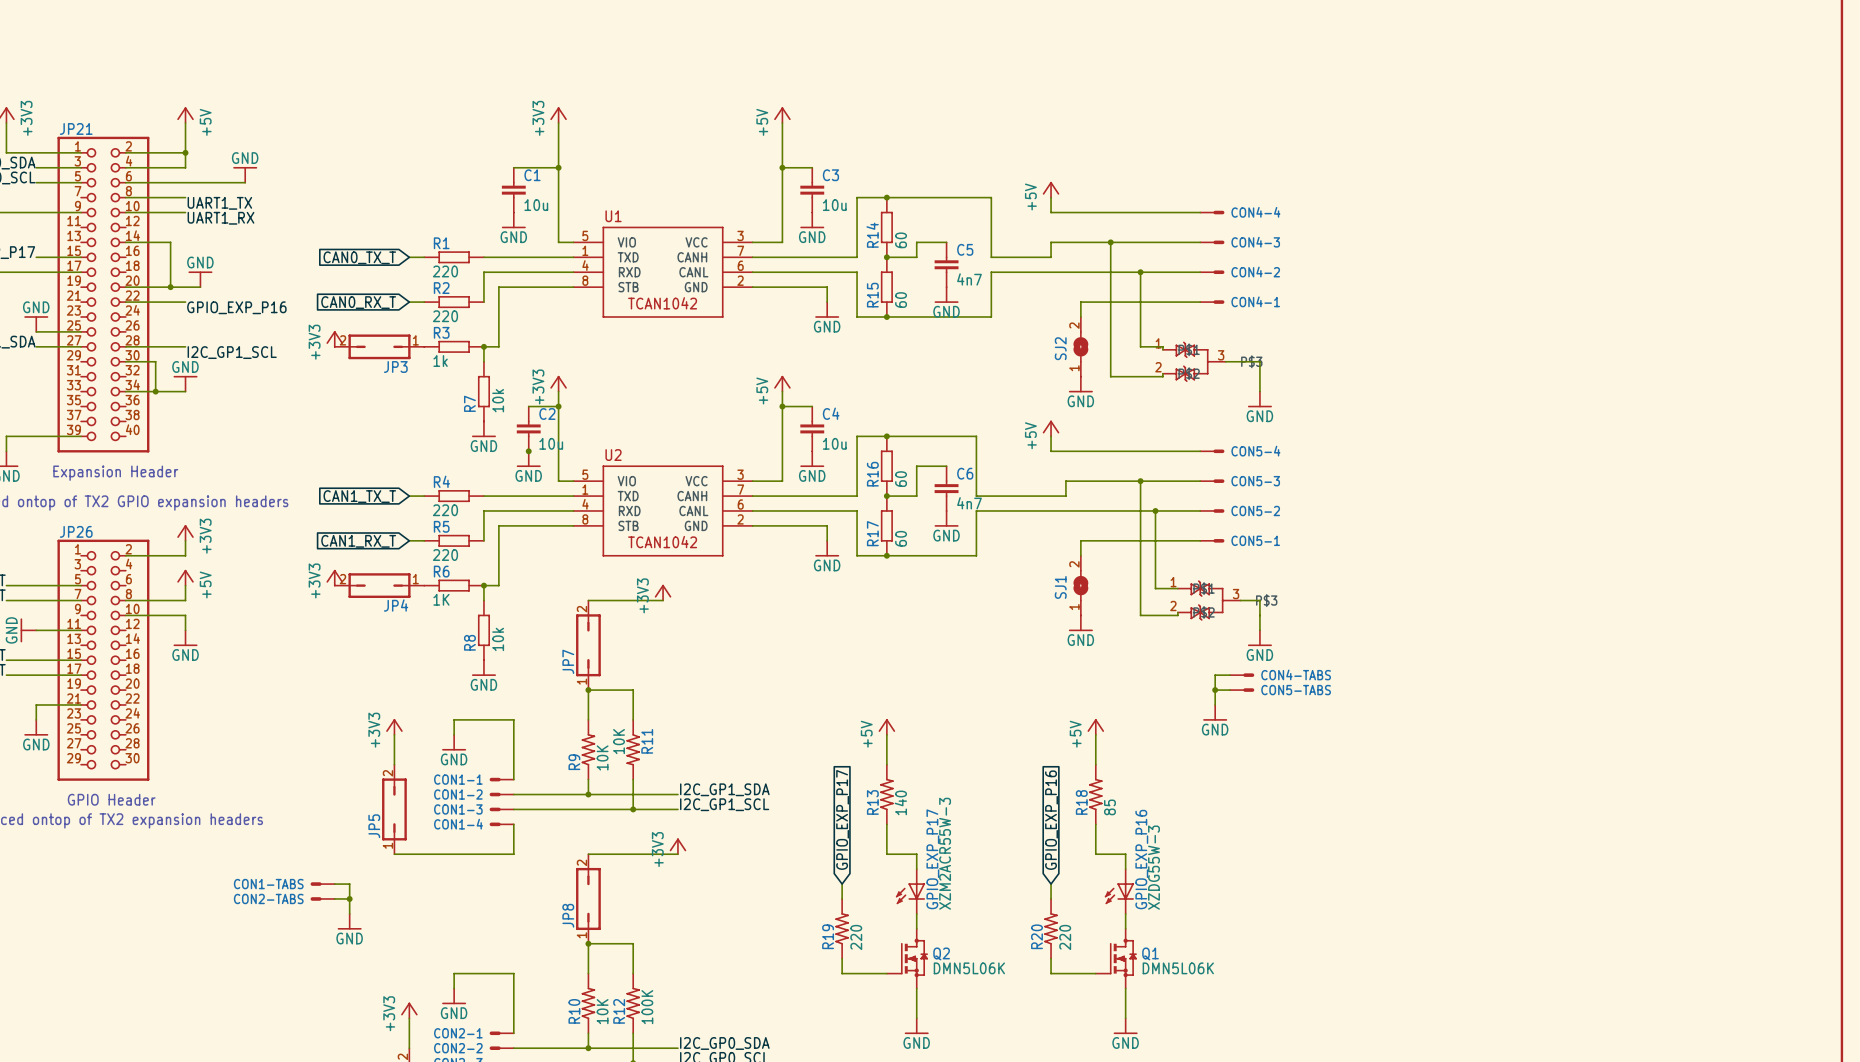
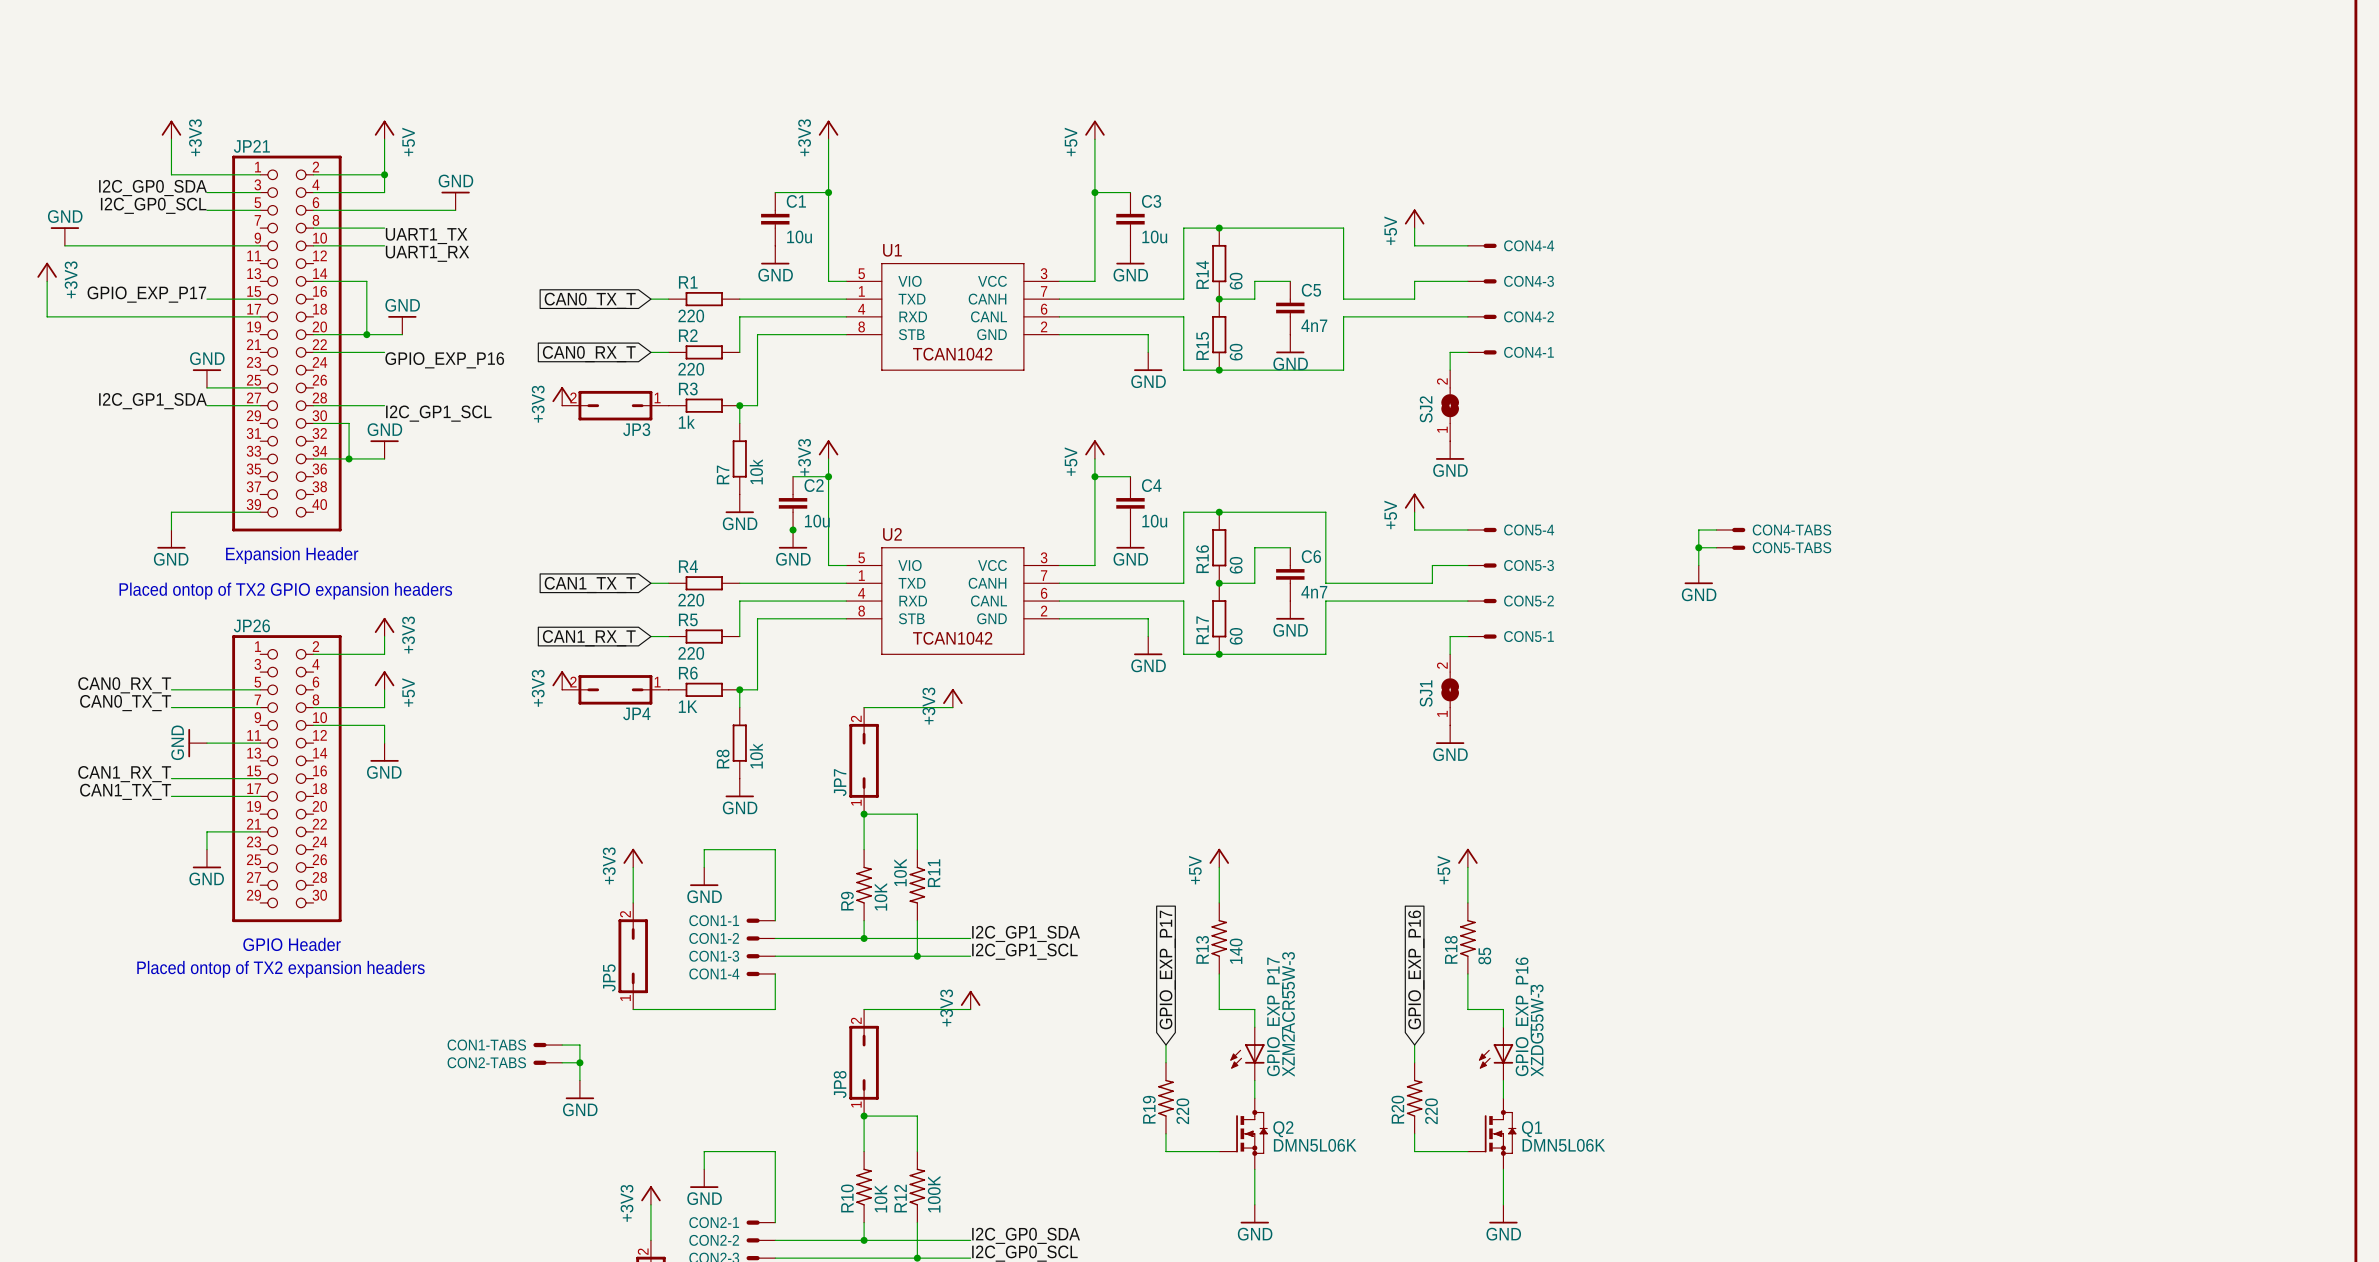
wire: (1095, 212) (1200, 212) -> none
CON4-4 position: (1212, 212) -> (1482, 245)
wire: (1095, 242) (1200, 242) -> none
wire: (1110, 242) (1110, 376) (1162, 376) (1162, 373) -> none
junction: (1110, 242) -> none
CON4-3 position: (1212, 242) -> (1482, 281)
wire: (1095, 272) (1200, 272) -> none
wire: (1140, 272) (1140, 346) (1162, 346) (1162, 349) -> none
junction: (1140, 272) -> none
CON4-2 position: (1212, 272) -> (1482, 316)
wire: (1095, 302) (1200, 302) -> none
CON4-1 position: (1212, 302) -> (1482, 352)
part: (1194, 361) -> none
wire: (1225, 361) (1259, 361) (1259, 391) -> none
power symbol: GND (1259, 399) -> none
wire: (1095, 451) (1200, 451) -> none
CON5-4 position: (1212, 451) -> (1482, 529)
wire: none -> (1716, 529) (1698, 529) (1698, 565)
wire: none -> (1698, 547) (1716, 547)
junction: none -> (1698, 547)
wire: (1095, 481) (1200, 481) -> none
wire: (1140, 481) (1140, 615) (1177, 615) (1177, 612) -> none
junction: (1140, 481) -> none
CON5-3 position: (1212, 481) -> (1482, 565)
power symbol: none -> GND (1698, 574)
wire: (1095, 510) (1200, 510) -> none
wire: (1155, 510) (1155, 588) (1177, 588) -> none
junction: (1155, 510) -> none
CON5-2 position: (1212, 510) -> (1482, 601)
wire: (1095, 540) (1200, 540) -> none
CON5-1 position: (1212, 540) -> (1482, 636)
part: (1209, 600) -> none
wire: (1240, 600) (1259, 600) (1259, 630) -> none
power symbol: GND (1259, 638) -> none
wire: (1230, 675) (1215, 675) (1215, 704) -> none
CON4-TABS position: (1242, 675) -> (1730, 529)
wire: (1215, 690) (1230, 690) -> none
junction: (1215, 690) -> none
CON5-TABS position: (1242, 690) -> (1730, 547)
power symbol: GND (1215, 712) -> none

